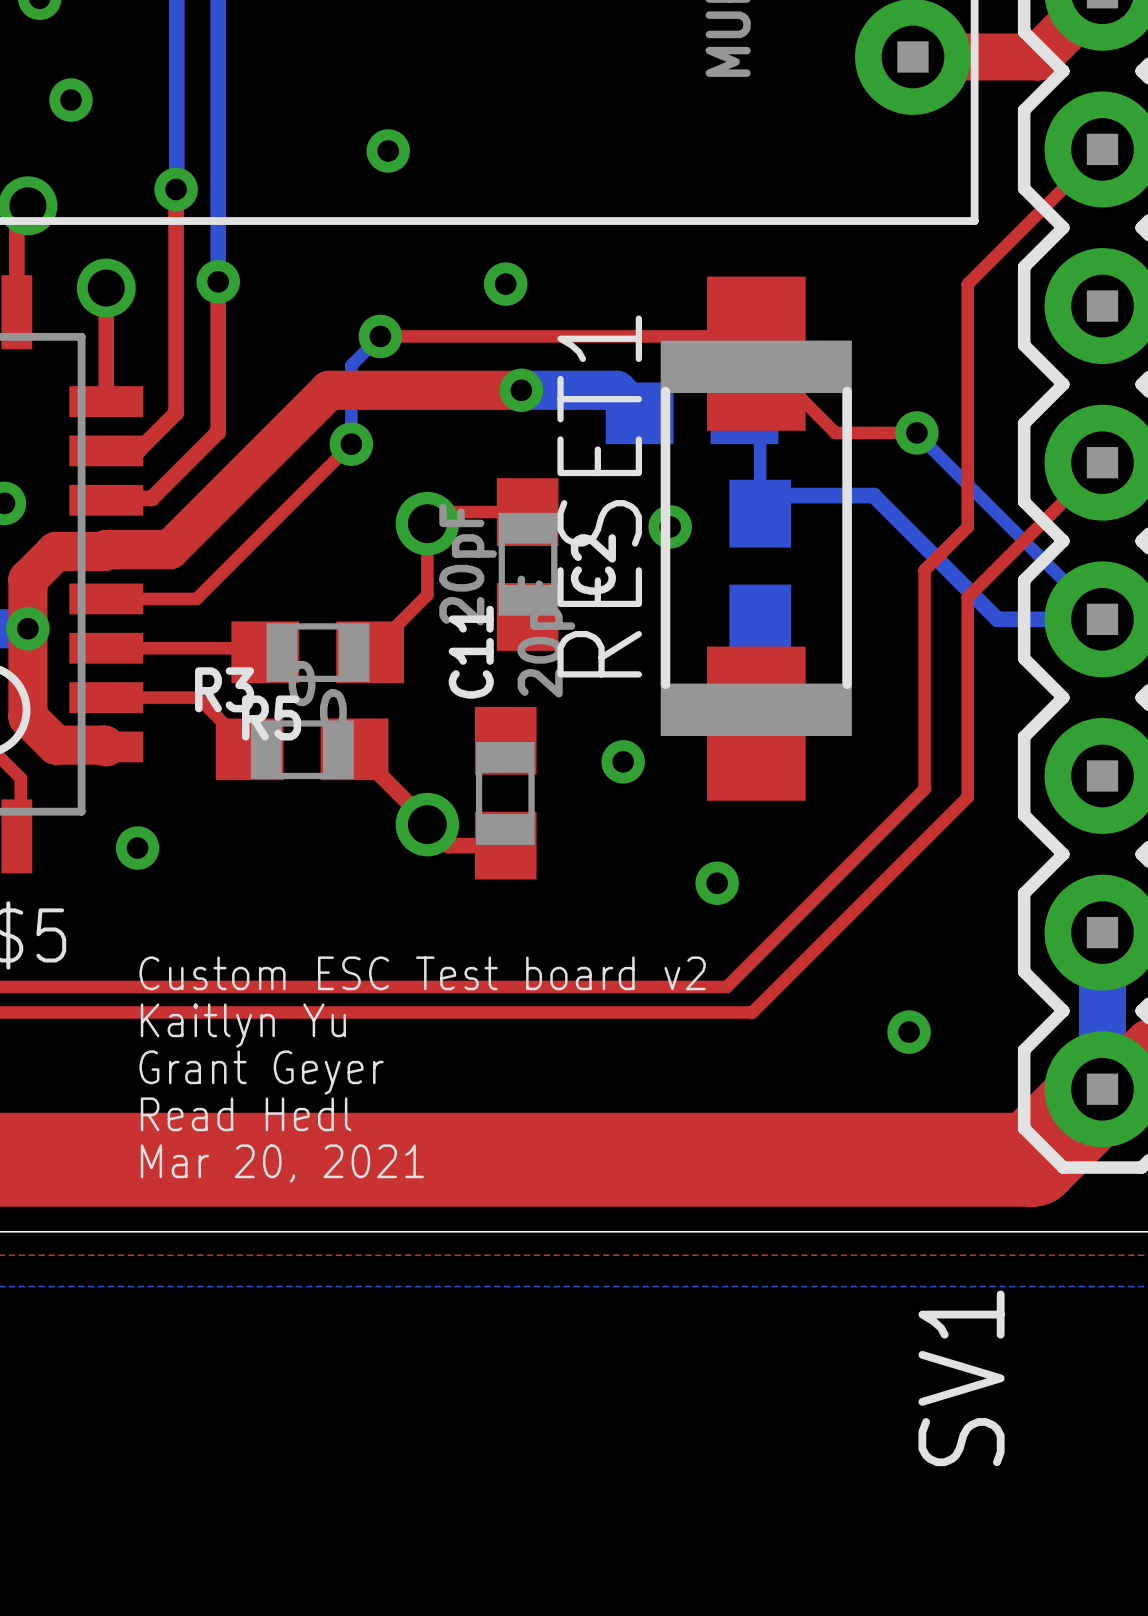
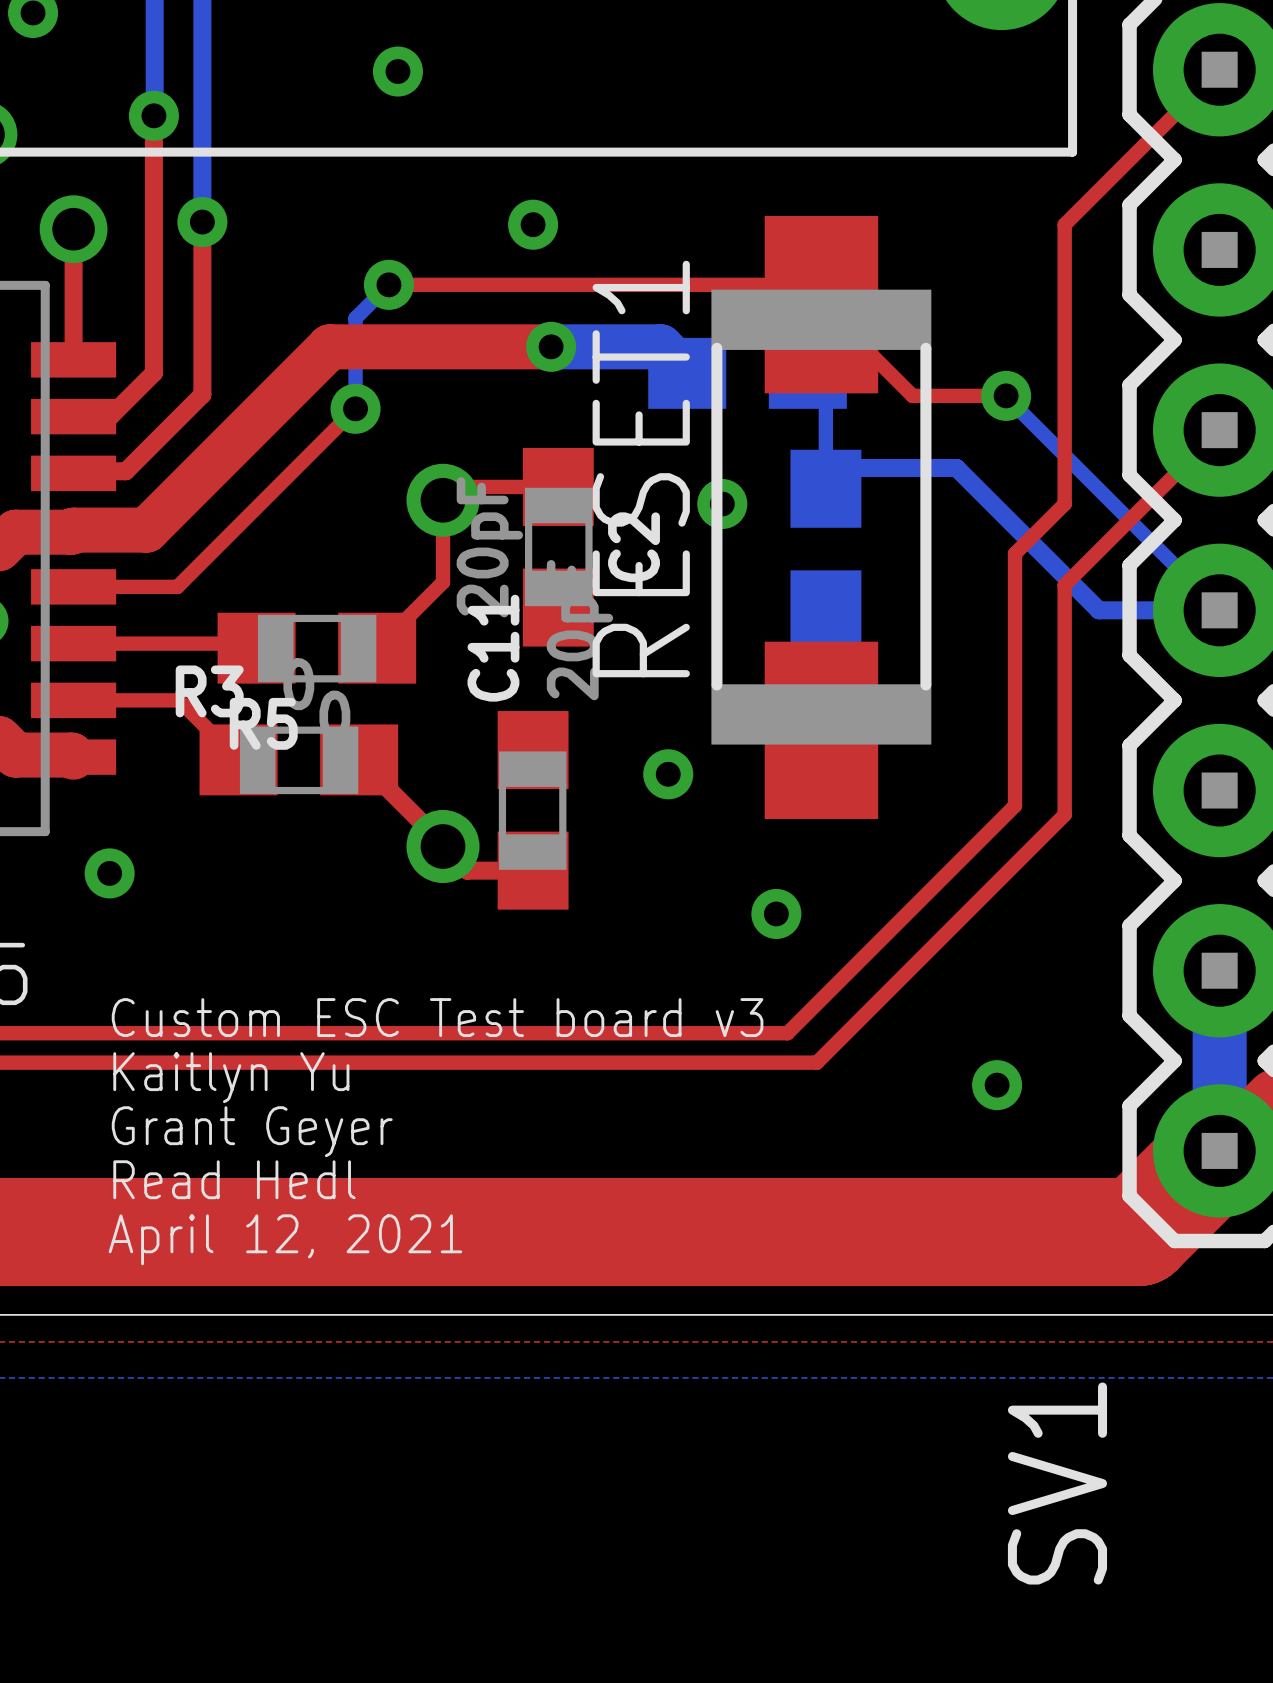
text: Custom ESC Test board v2 (422, 973) -> Custom ESC Test board v3 (437, 1017)
text: Mar 20, 2021 (282, 1163) -> April 12, 2021 (285, 1239)

